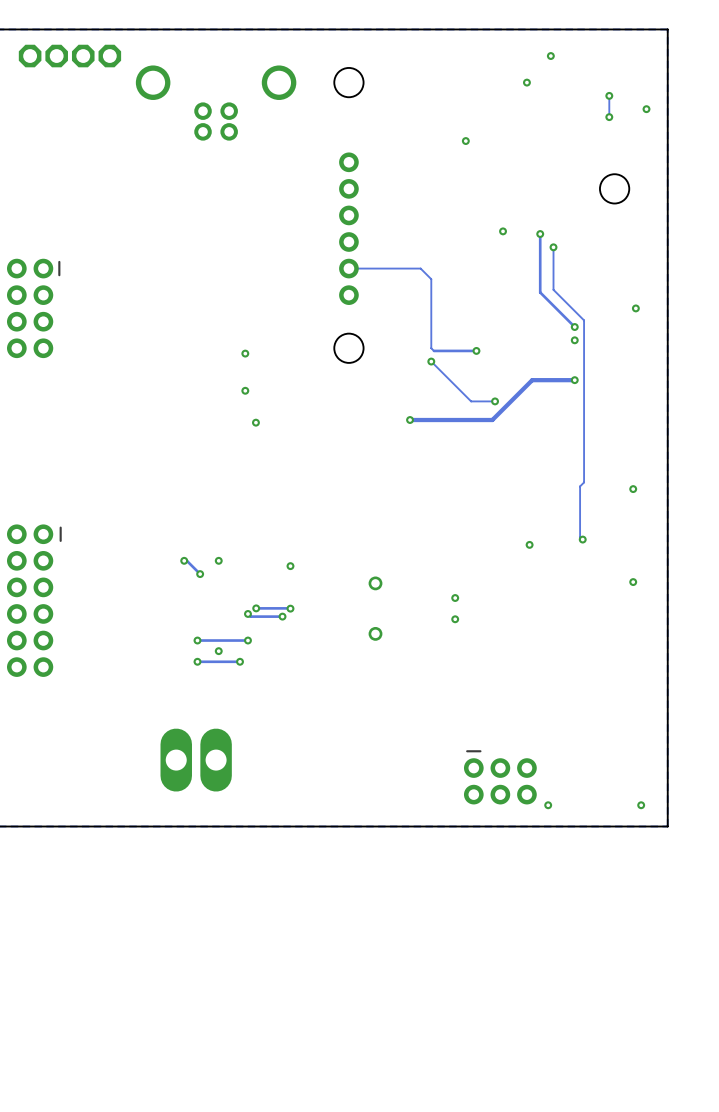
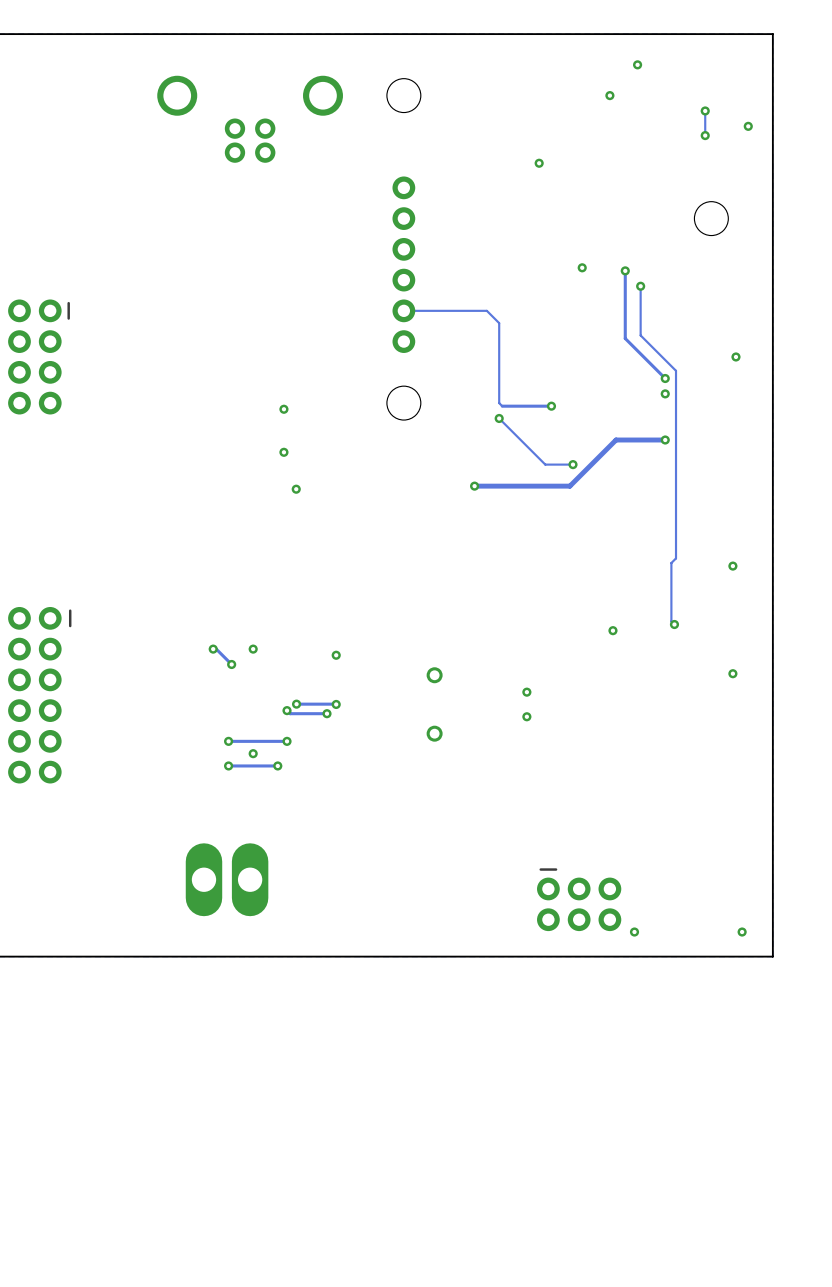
part: (30, 56) -> none
part: (56, 56) -> none
part: (83, 56) -> none
part: (109, 56) -> none

